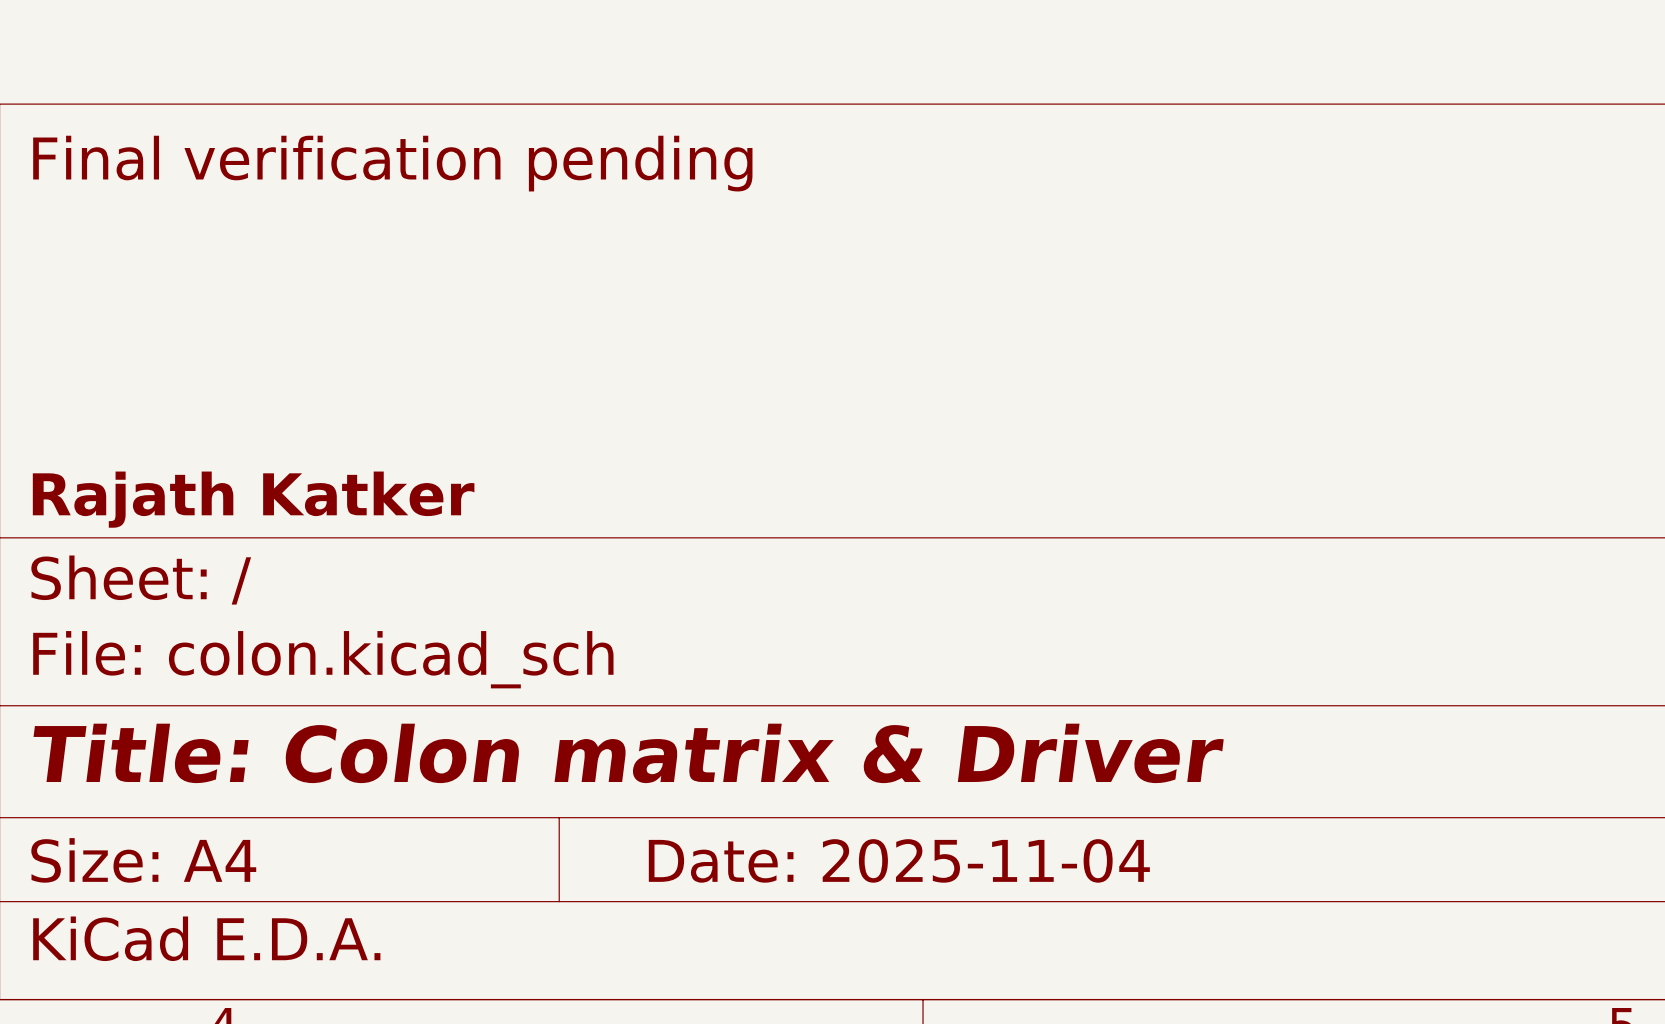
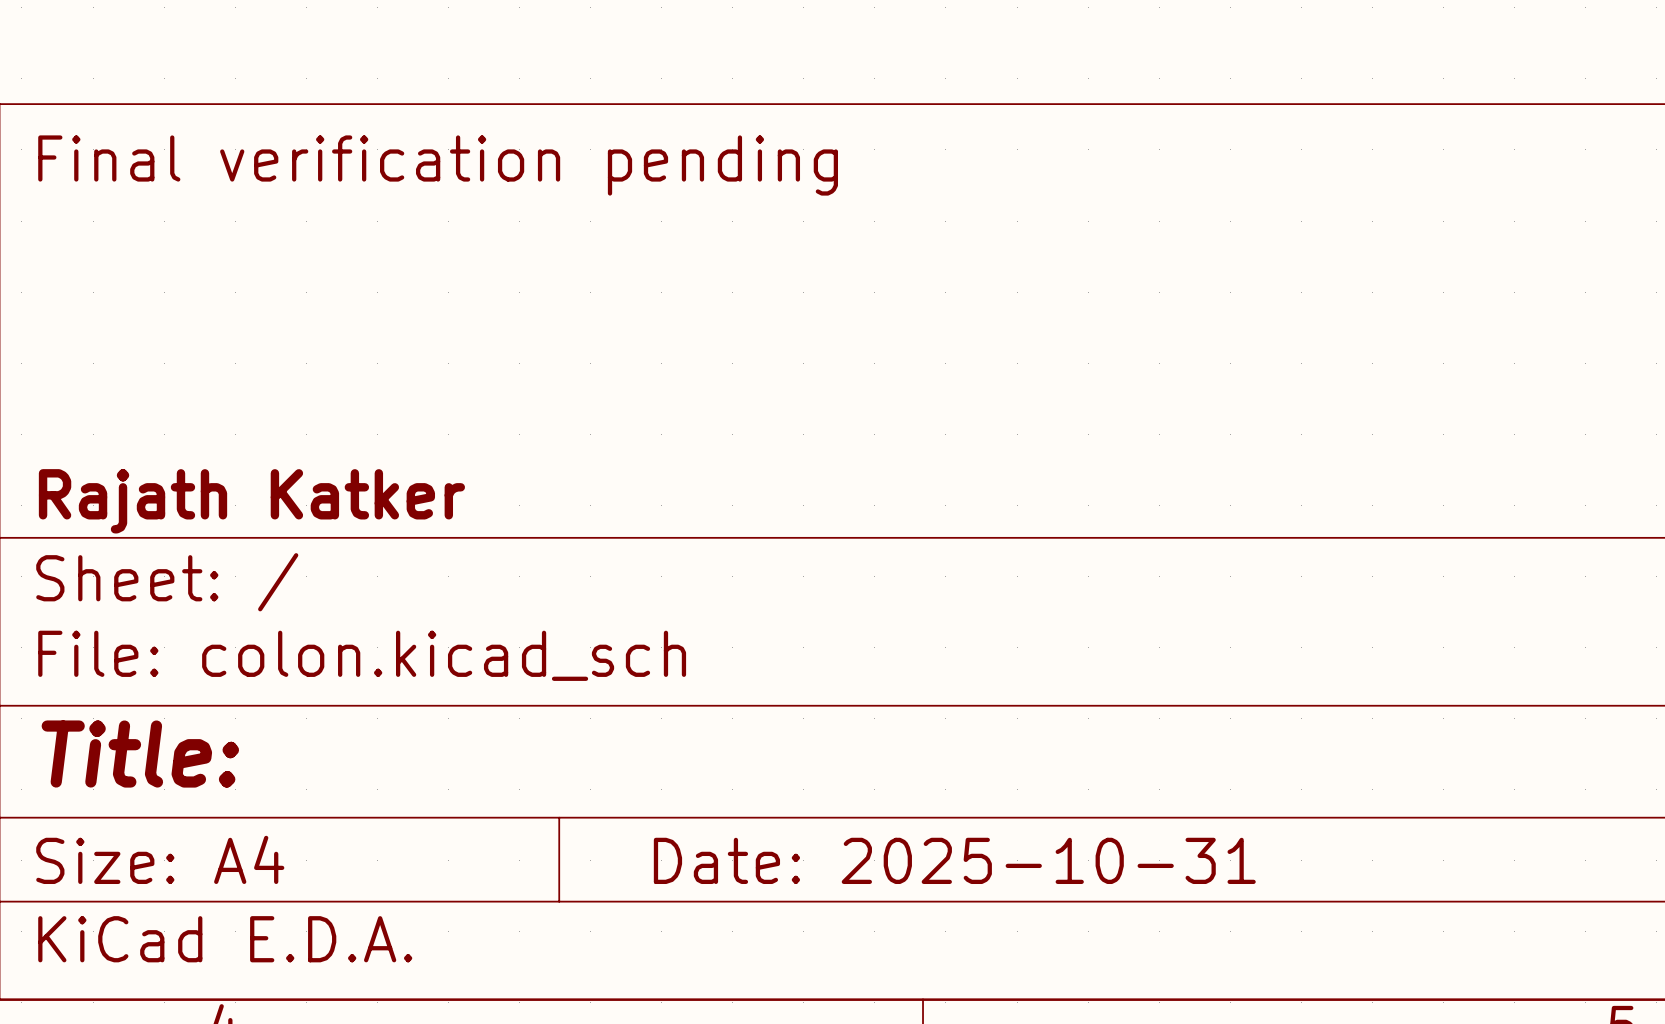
title block: Title: Colon matrix & Driver (628, 753) -> Title: (140, 754)
title block: Date: 2025-11-04 (899, 860) -> Date: 2025-10-31 (954, 860)

